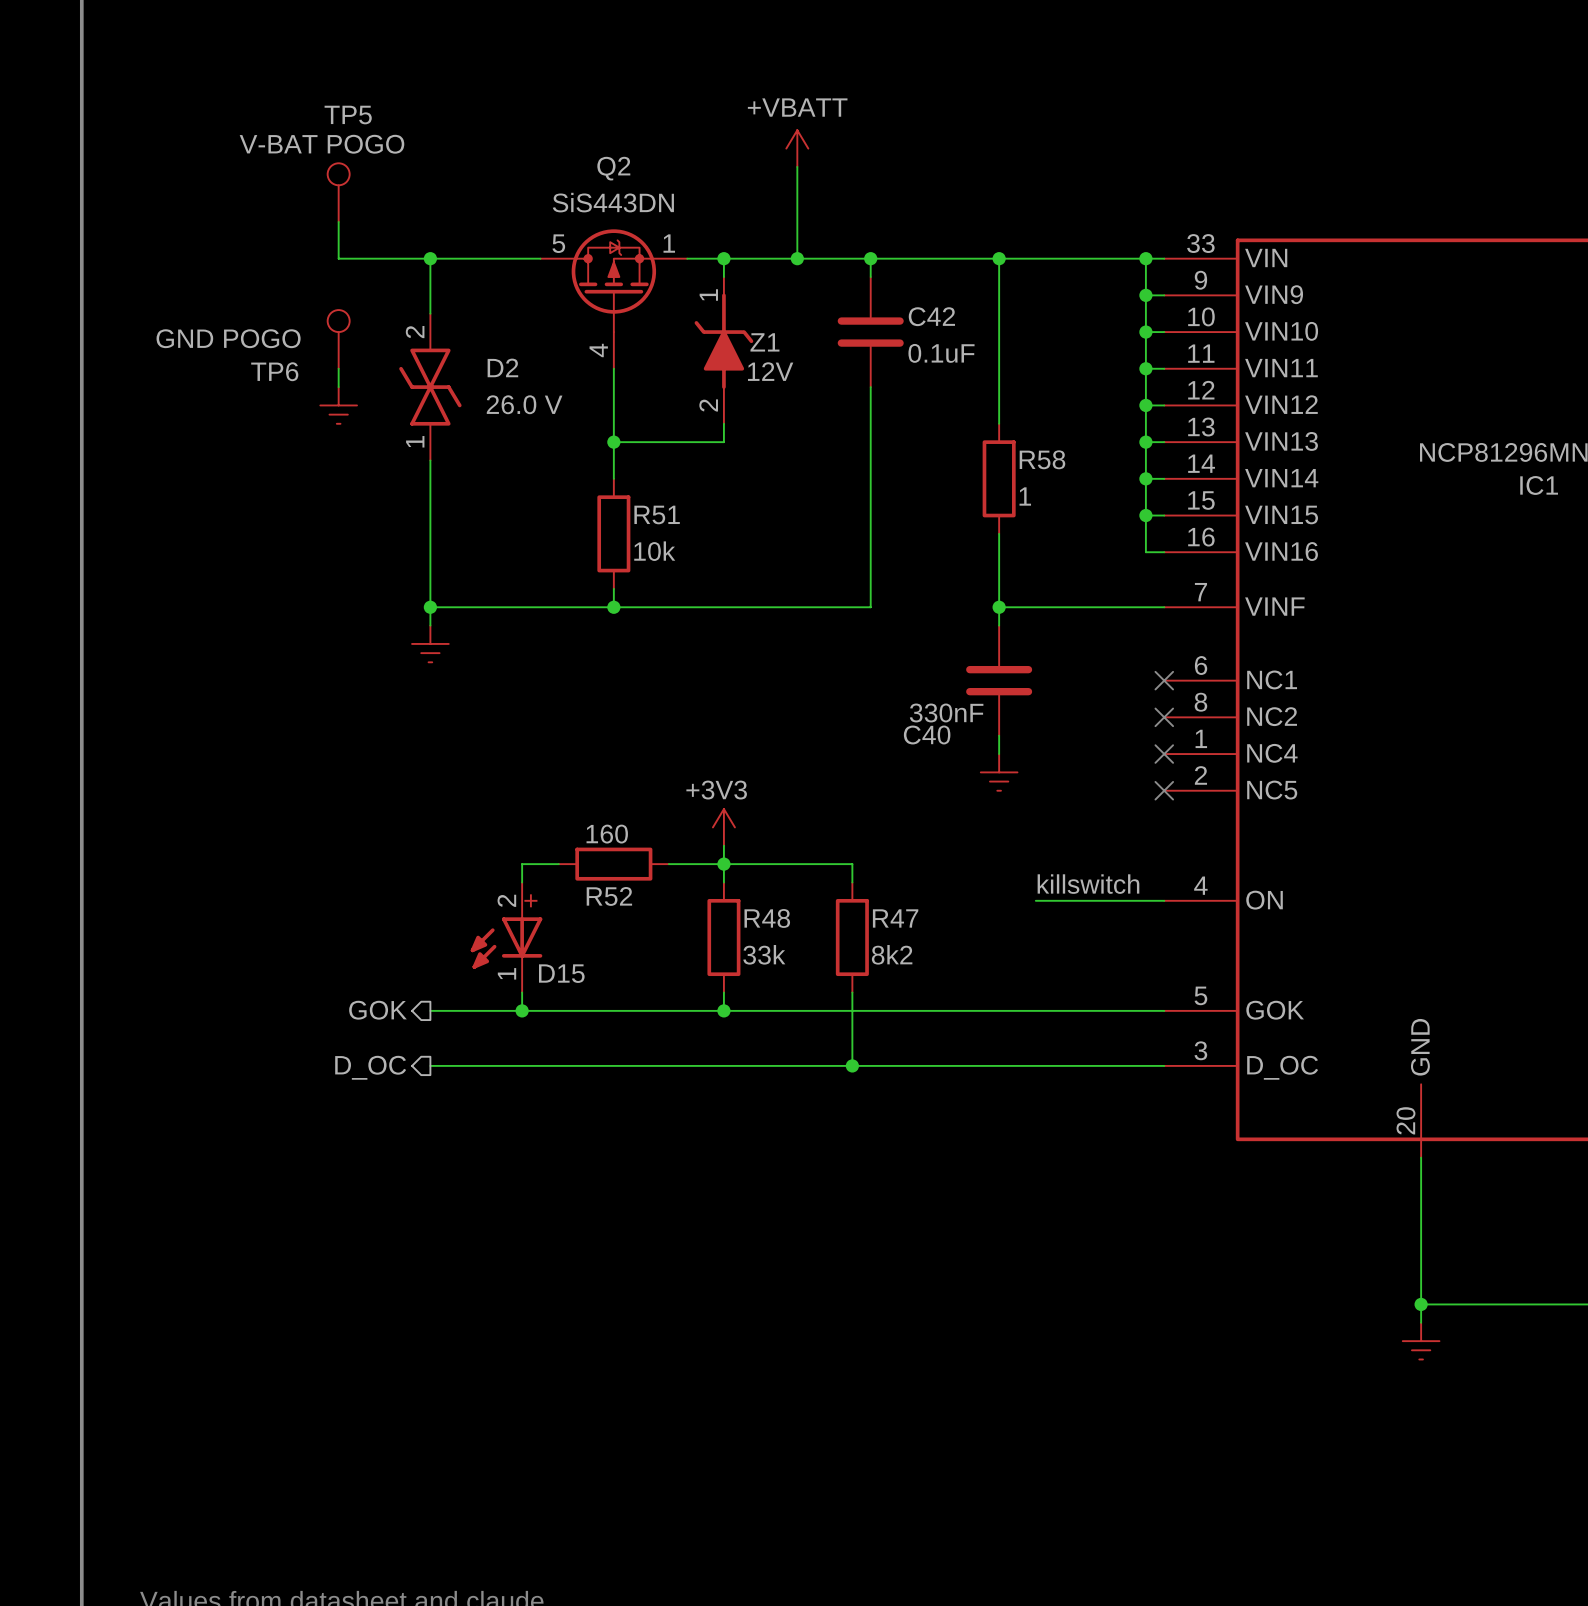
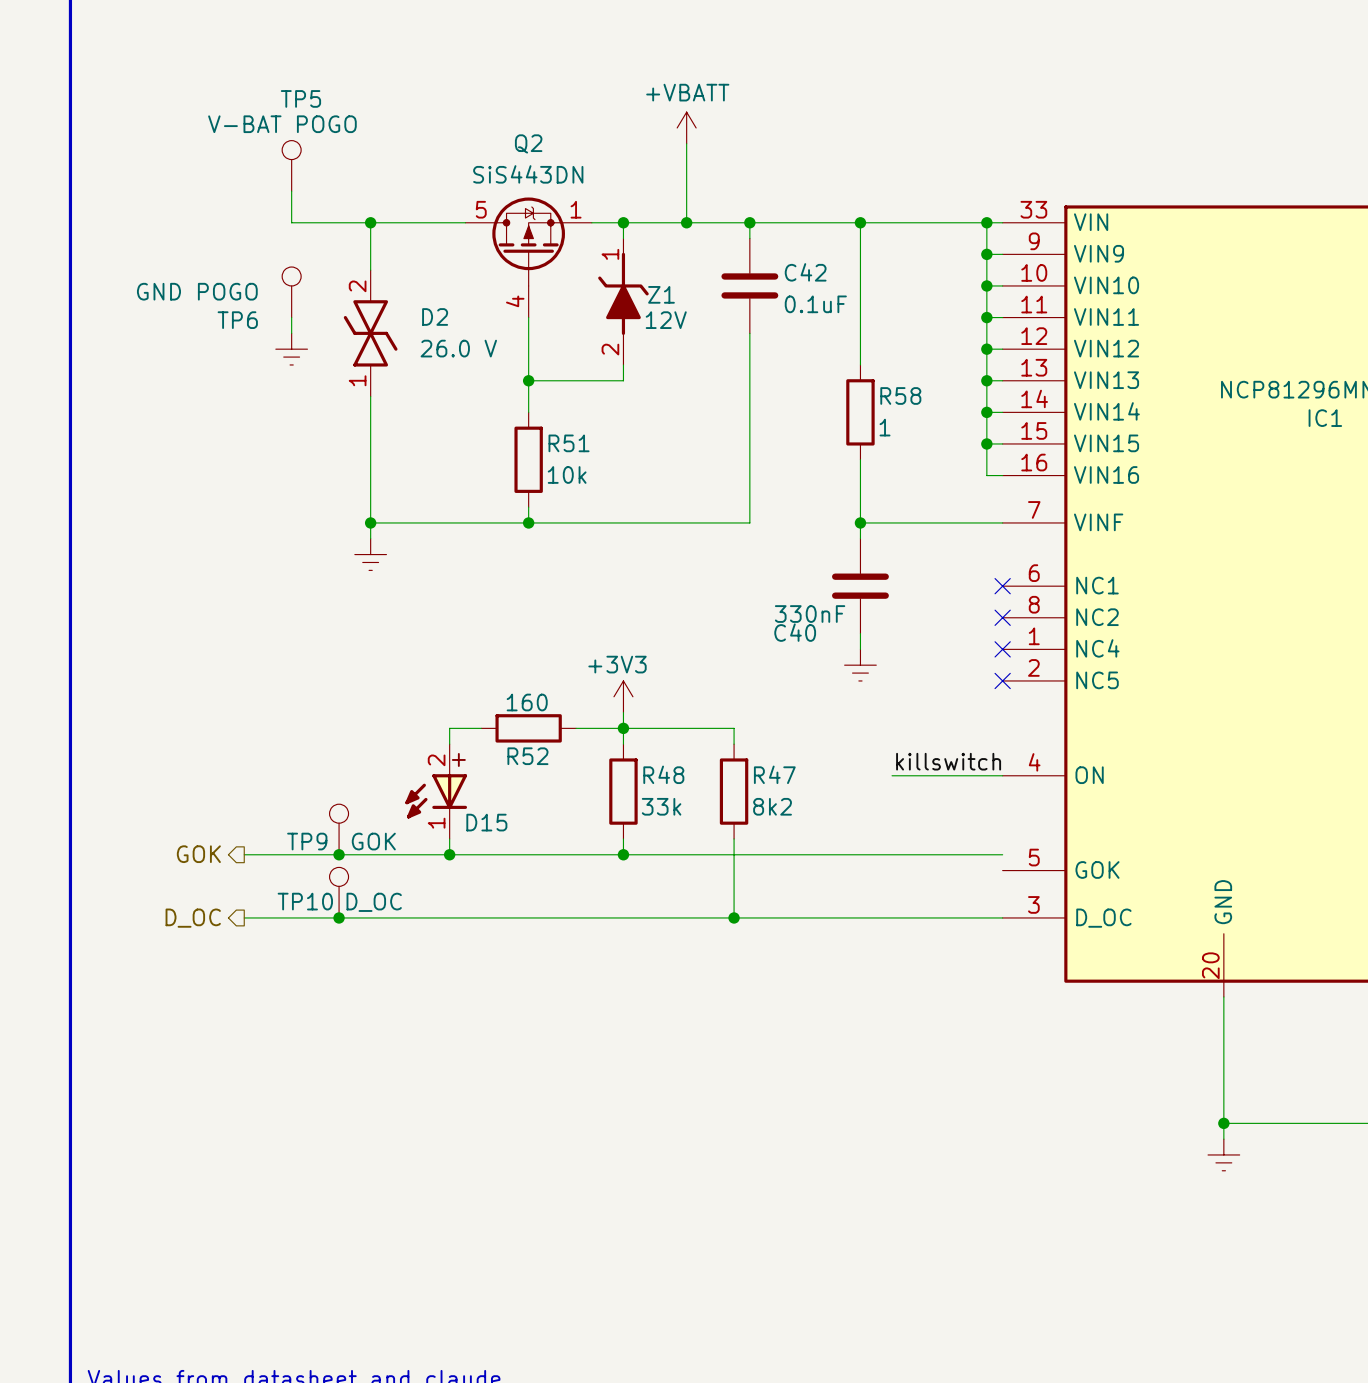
power symbol position: +3V3 (723, 827) -> +3V3 (623, 696)
wire: (558, 864) (522, 864) (522, 882) -> (481, 728) (449, 728) (449, 744)
R52 position: (613, 864) -> (528, 728)
wire: (668, 864) (852, 864) (852, 882) -> (576, 728) (734, 728) (734, 744)
junction position: (723, 864) -> (623, 728)
D15 position: (495, 891) -> (426, 752)
R48 position: (723, 937) -> (623, 791)
R47 position: (852, 937) -> (734, 791)
TP9: none -> (339, 829)
wire: none -> (244, 854) (1002, 854)
junction: none -> (339, 854)
hierarchical label position: GOK (377, 1010) -> GOK (198, 854)
wire: (430, 1010) (1164, 1010) -> none
junction position: (522, 1010) -> (449, 854)
junction position: (723, 1010) -> (623, 854)
TP10: none -> (339, 892)
wire: none -> (244, 917) (370, 917)
junction: none -> (339, 917)
hierarchical label position: D_OC (370, 1067) -> D_OC (193, 918)

